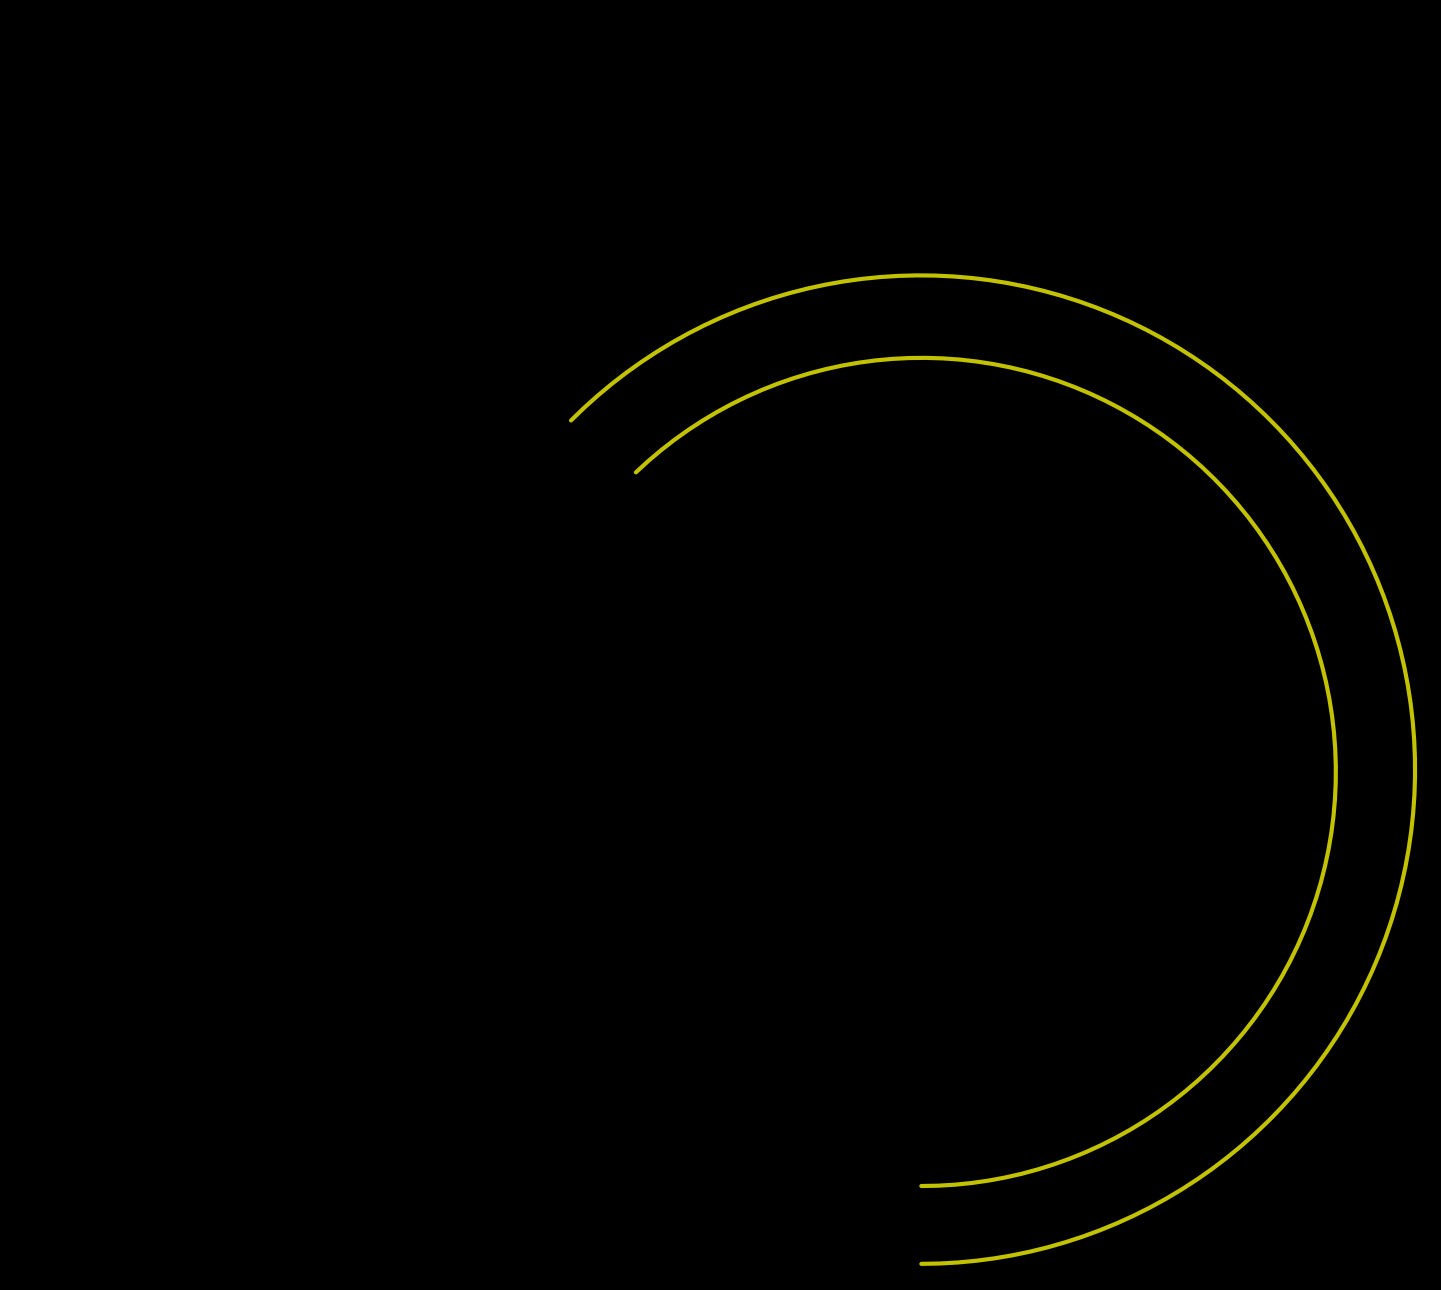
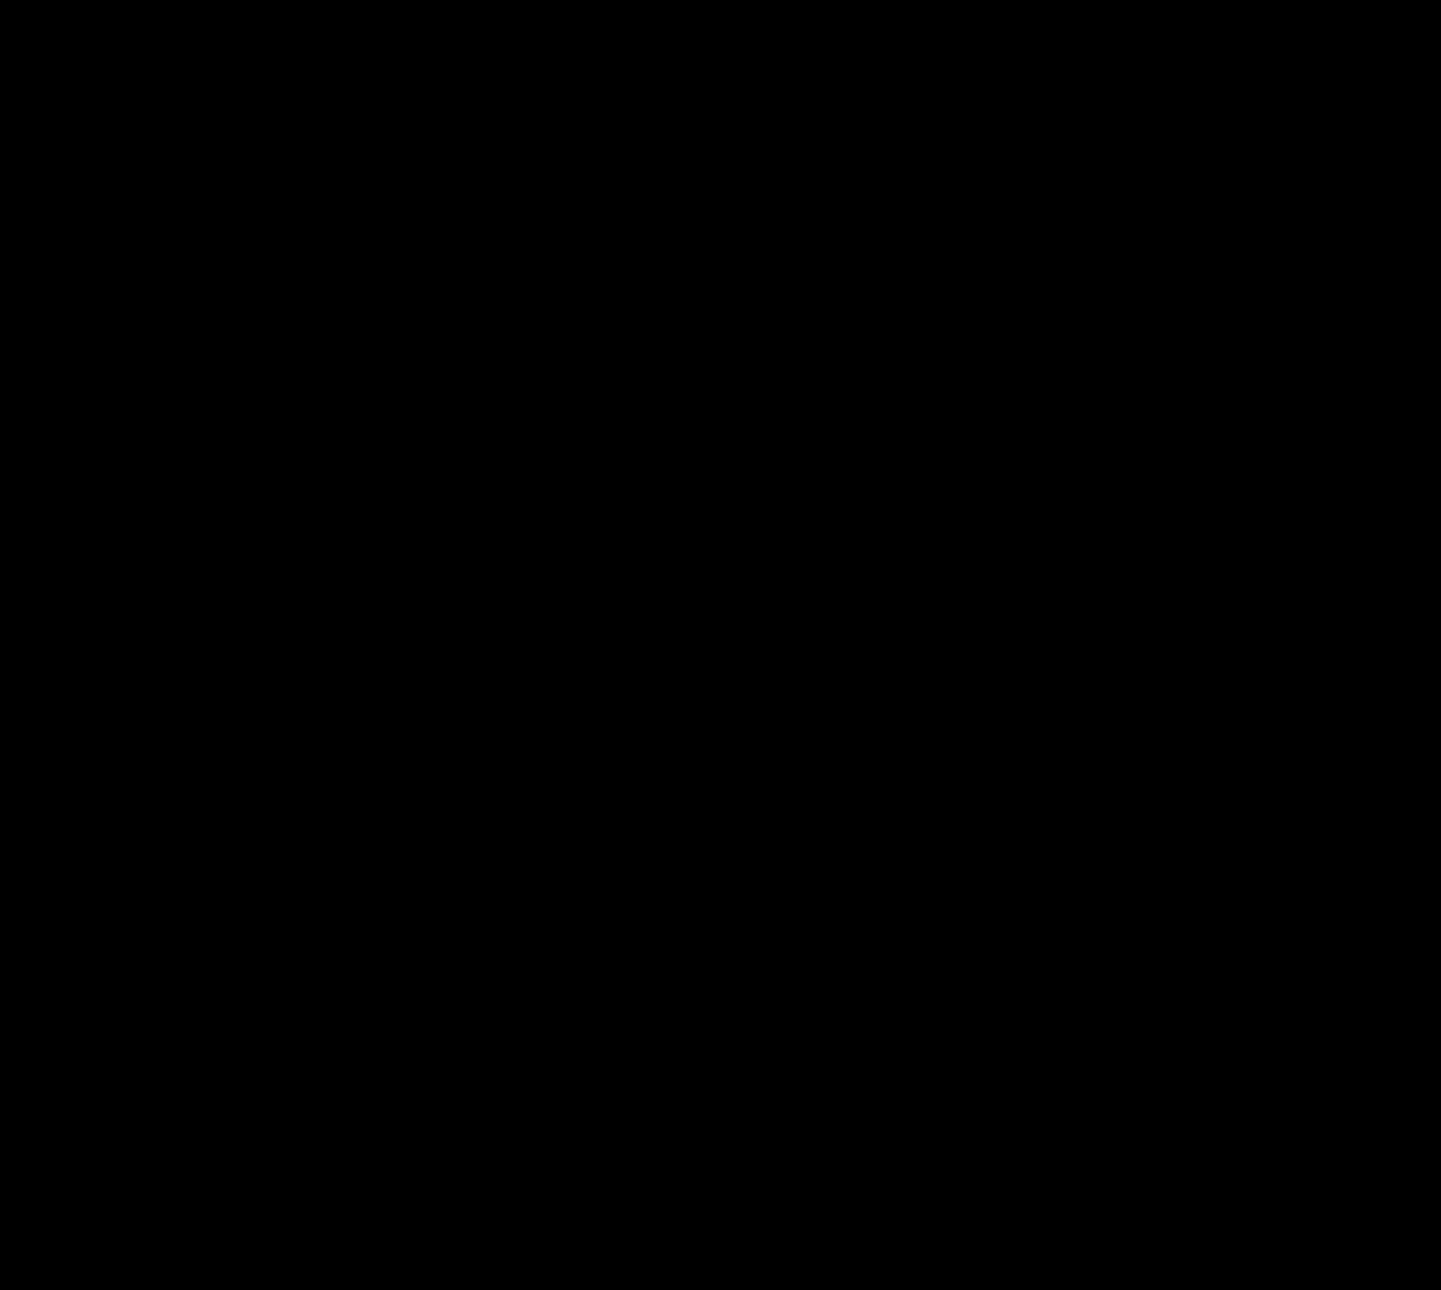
board edge: (570, 420) (611, 383) (672, 342) (721, 317) (772, 298) (825, 284) (880, 277) (934, 275) (1007, 283) (1078, 301) (1129, 321) (1178, 347) (1237, 390) (1277, 427) (1313, 469) (1353, 530) (1377, 580) (1395, 631) (1407, 685) (1414, 739) (1413, 813) (1401, 885) (1385, 937) (1364, 988) (1326, 1051) (1293, 1094) (1254, 1133) (1212, 1168) (1150, 1207) (1100, 1230) (1048, 1247) (976, 1260) (921, 1263) -> none
board edge: (635, 472) (674, 439) (716, 412) (762, 389) (809, 373) (859, 362) (909, 358) (959, 359) (1009, 367) (1058, 381) (1104, 400) (1148, 425) (1189, 455) (1225, 490) (1257, 529) (1284, 572) (1306, 618) (1322, 666) (1332, 715) (1335, 765) (1333, 816) (1324, 866) (1310, 914) (1290, 960) (1264, 1004) (1233, 1044) (1198, 1080) (1158, 1111) (1115, 1137) (1069, 1158) (1021, 1173) (971, 1182) (921, 1186) -> none

